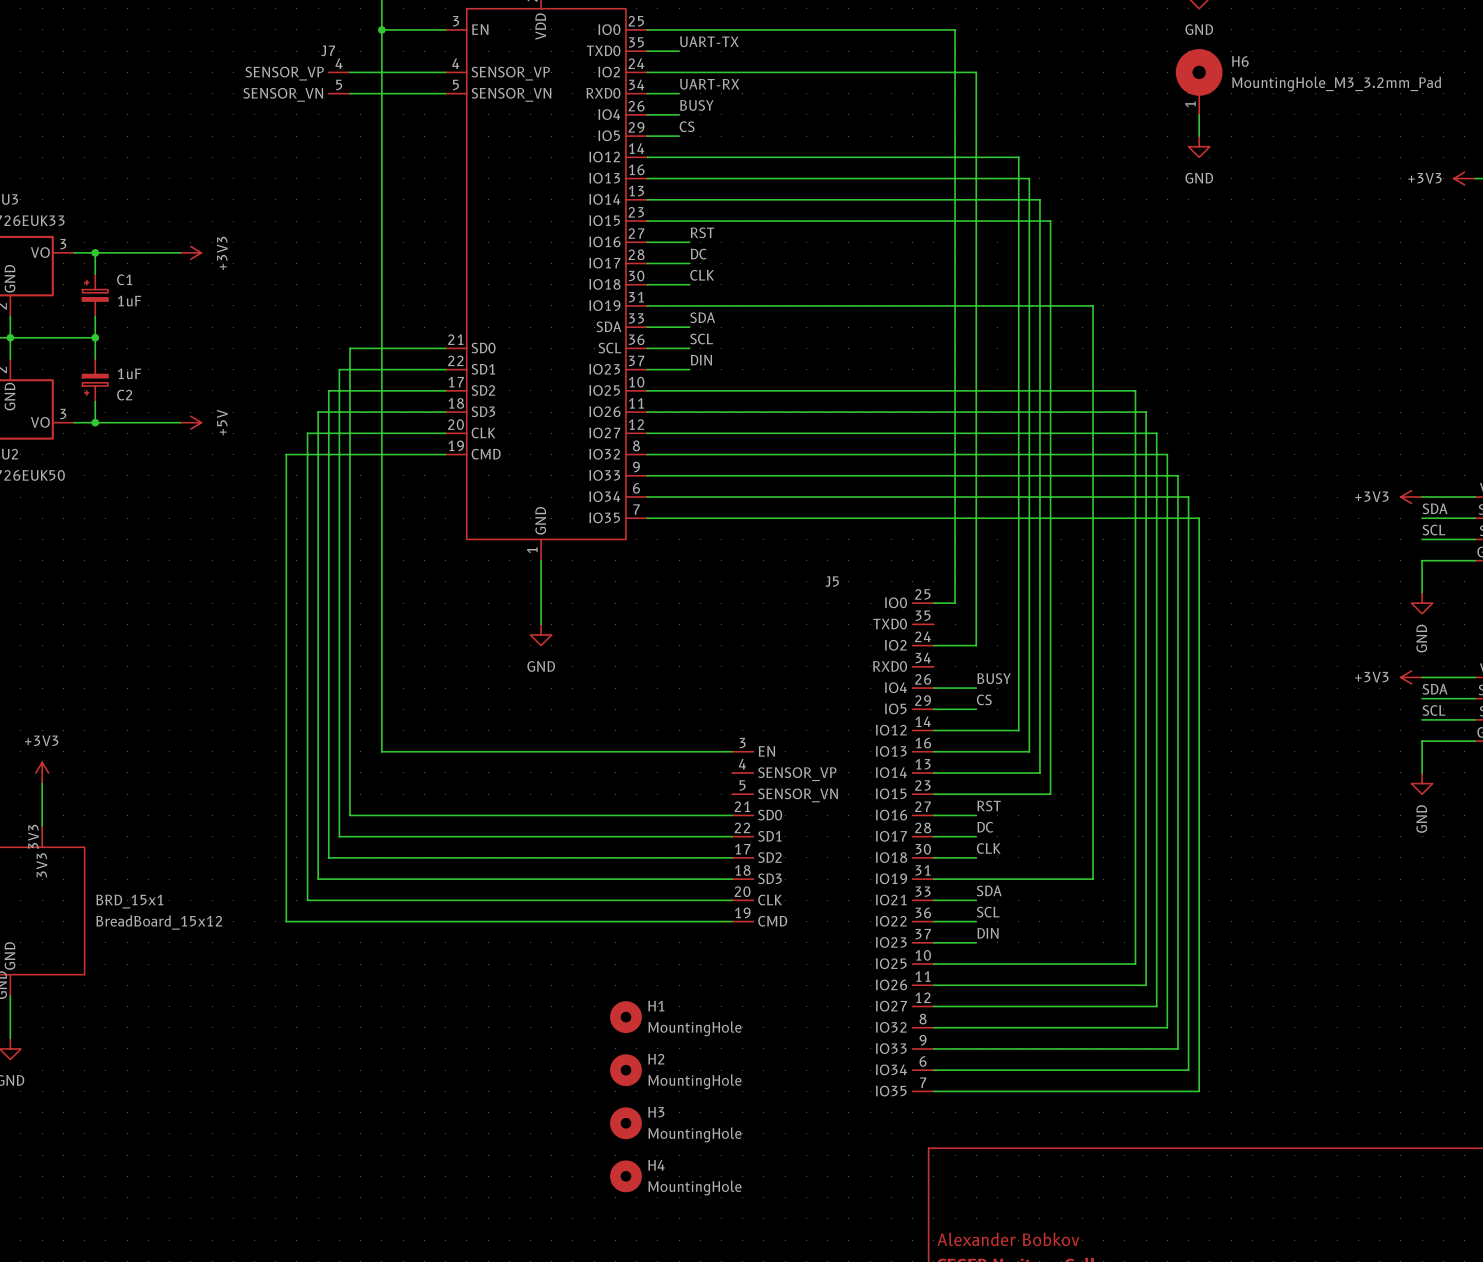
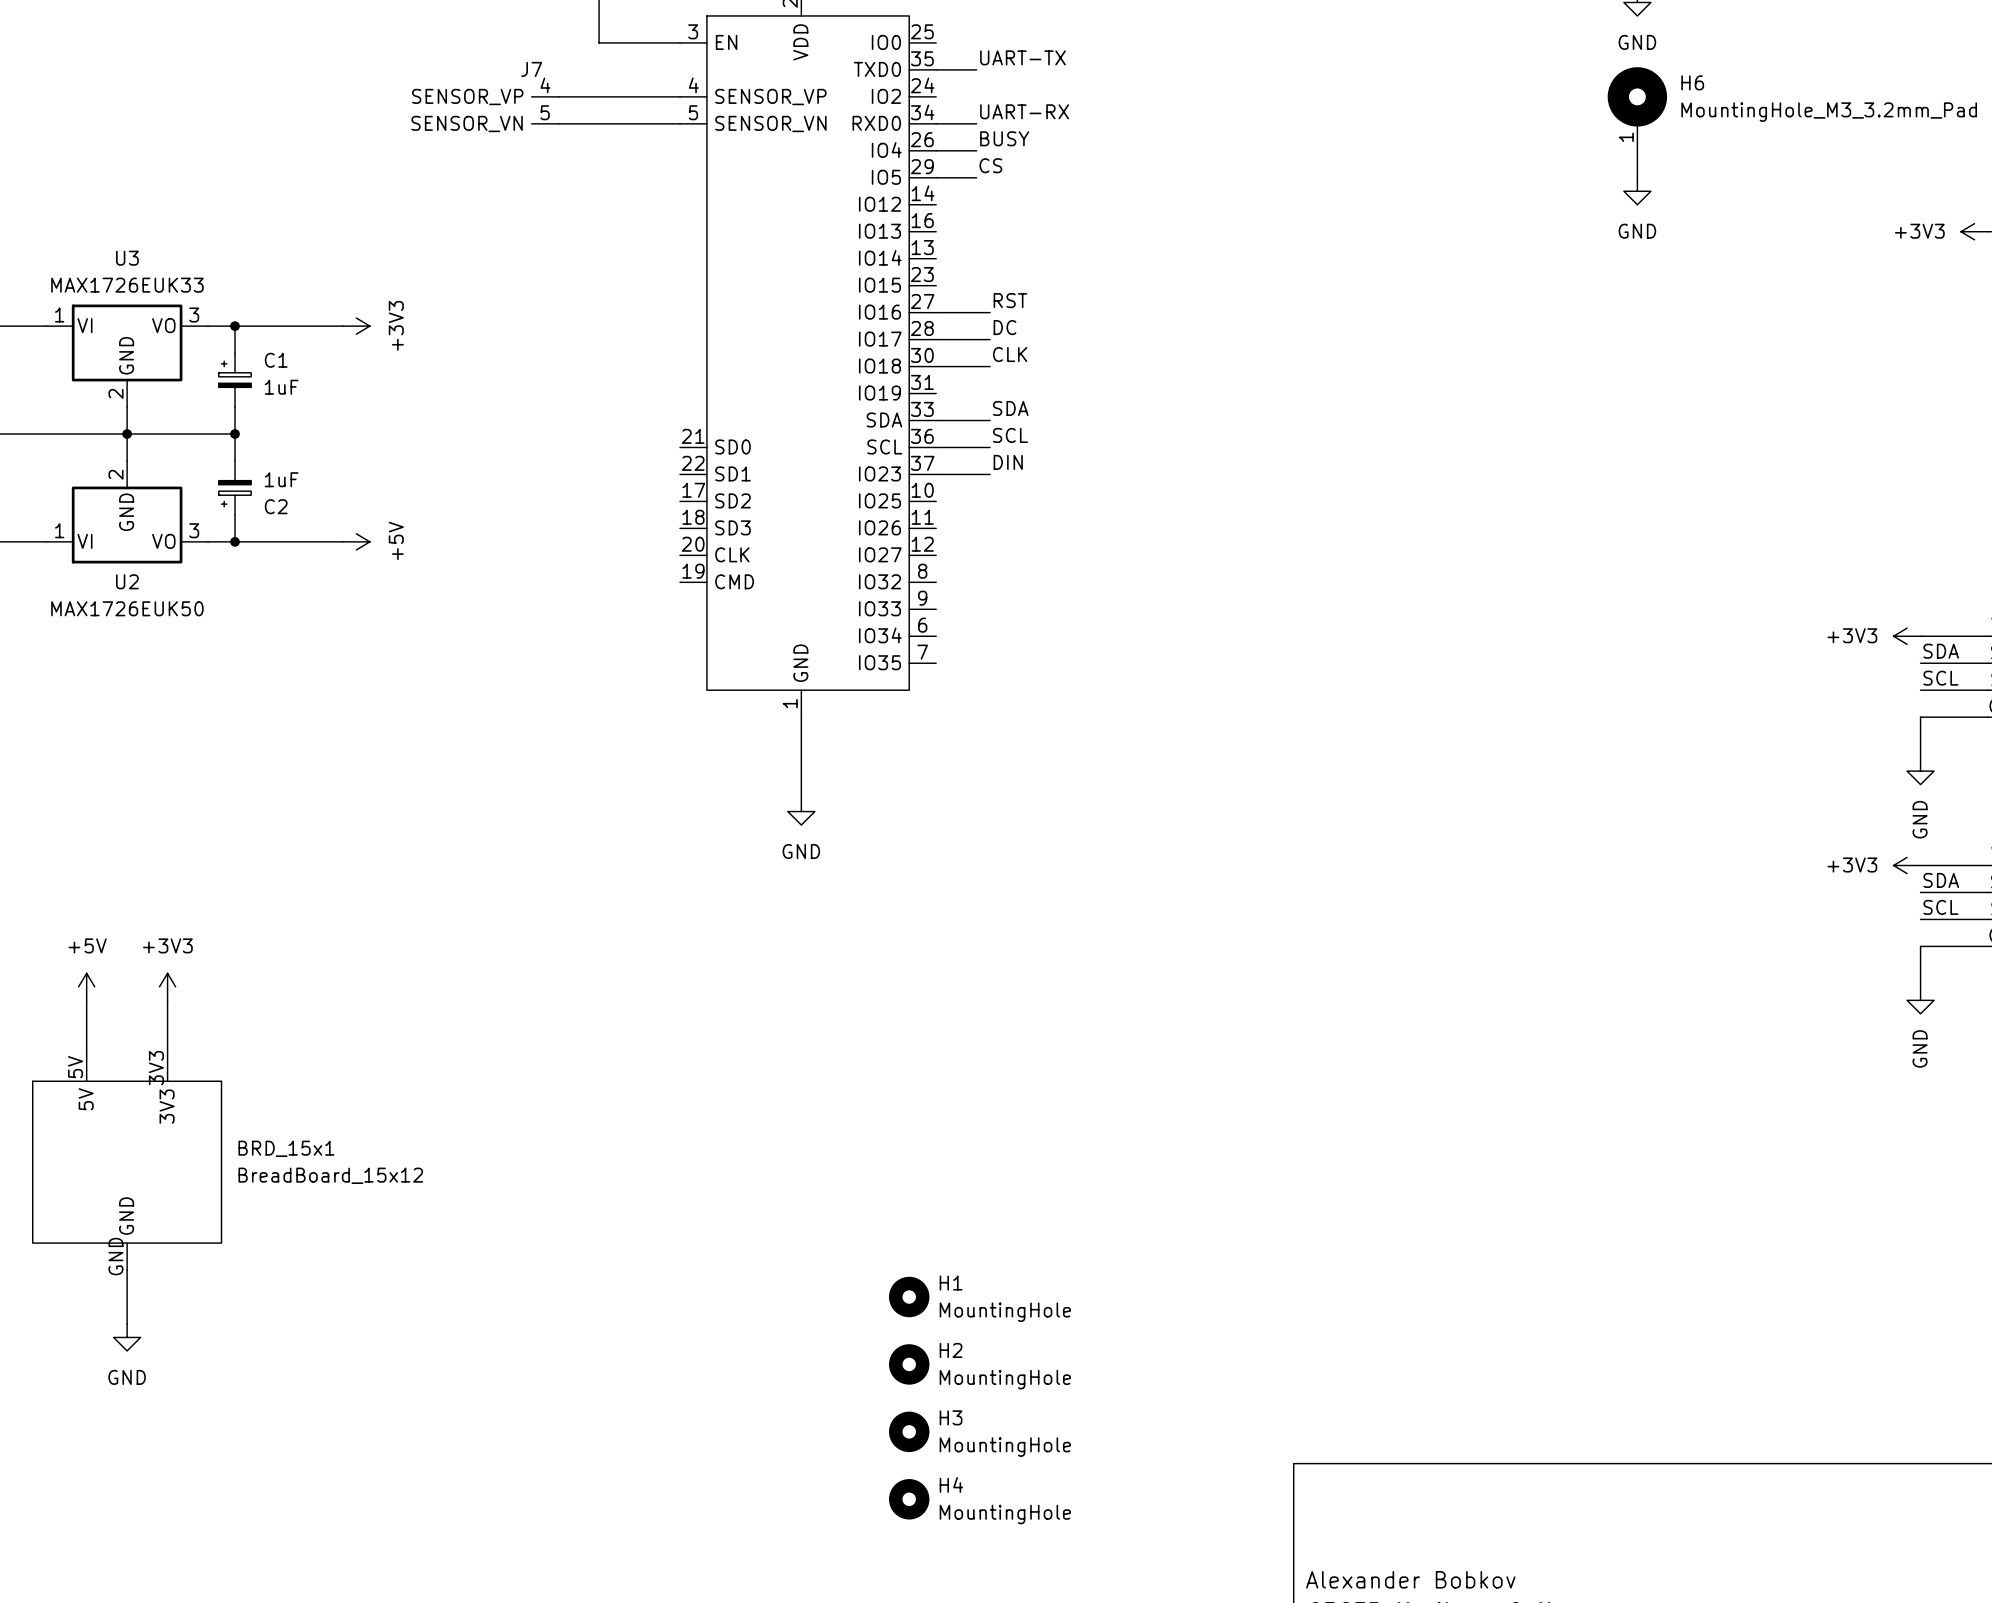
wire: (381, 29) (381, 751) (732, 751) -> none
junction: (381, 29) -> none
wire: (647, 29) (955, 29) (955, 603) (933, 603) -> none
wire: (647, 72) (976, 72) (976, 645) (933, 645) -> none
wire: (647, 157) (1018, 157) (1018, 730) (933, 730) -> none
wire: (647, 178) (1029, 178) (1029, 751) (933, 751) -> none
wire: (647, 199) (1039, 199) (1039, 772) (933, 772) -> none
wire: (647, 221) (1050, 221) (1050, 794) (933, 794) -> none
wire: (647, 305) (1093, 305) (1093, 879) (933, 879) -> none
wire: (445, 348) (350, 348) (350, 815) (732, 815) -> none
wire: (445, 369) (339, 369) (339, 836) (732, 836) -> none
wire: (445, 390) (328, 390) (328, 857) (732, 857) -> none
wire: (647, 390) (1135, 390) (1135, 964) (933, 964) -> none
wire: (445, 412) (318, 412) (318, 879) (732, 879) -> none
wire: (647, 412) (1146, 412) (1146, 985) (933, 985) -> none
wire: (445, 433) (307, 433) (307, 900) (732, 900) -> none
wire: (647, 433) (1156, 433) (1156, 1006) (933, 1006) -> none
wire: (445, 454) (286, 454) (286, 921) (732, 921) -> none
wire: (647, 454) (1167, 454) (1167, 1027) (933, 1027) -> none
wire: (647, 475) (1177, 475) (1177, 1048) (933, 1048) -> none
wire: (647, 497) (1188, 497) (1188, 1070) (933, 1070) -> none
wire: (647, 518) (1199, 518) (1199, 1091) (933, 1091) -> none
label: BUSY (994, 678) -> none
wire: (933, 688) (976, 688) -> none
label: CS (984, 699) -> none
wire: (933, 709) (976, 709) -> none
label: RST (989, 806) -> none
wire: (933, 815) (976, 815) -> none
label: DC (985, 827) -> none
wire: (933, 836) (976, 836) -> none
J5: (832, 847) -> none
label: CLK (988, 848) -> none
wire: (933, 857) (976, 857) -> none
label: SDA (989, 890) -> none
wire: (933, 900) (976, 900) -> none
label: SCL (988, 912) -> none
wire: (933, 921) (976, 921) -> none
label: DIN (988, 933) -> none
wire: (933, 942) (976, 942) -> none

